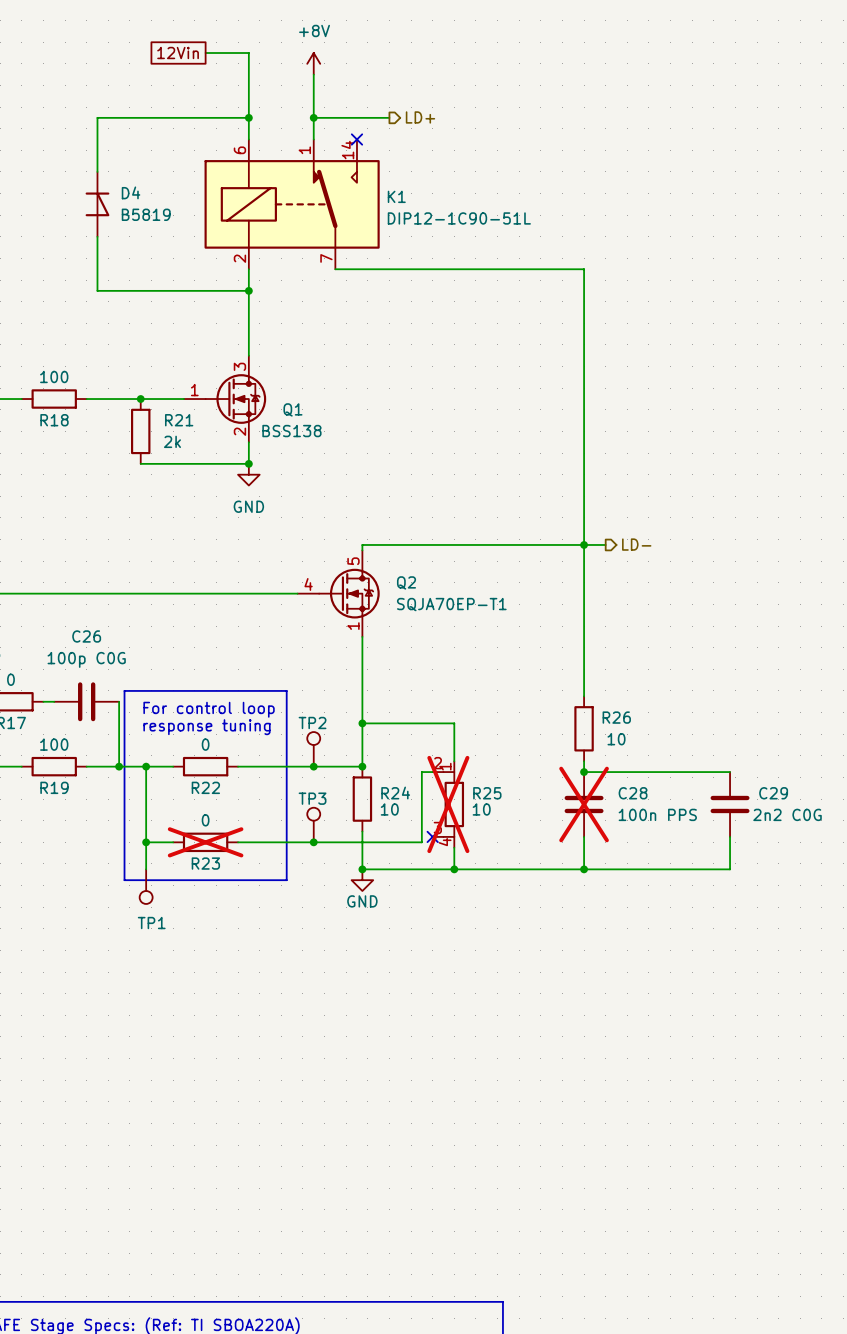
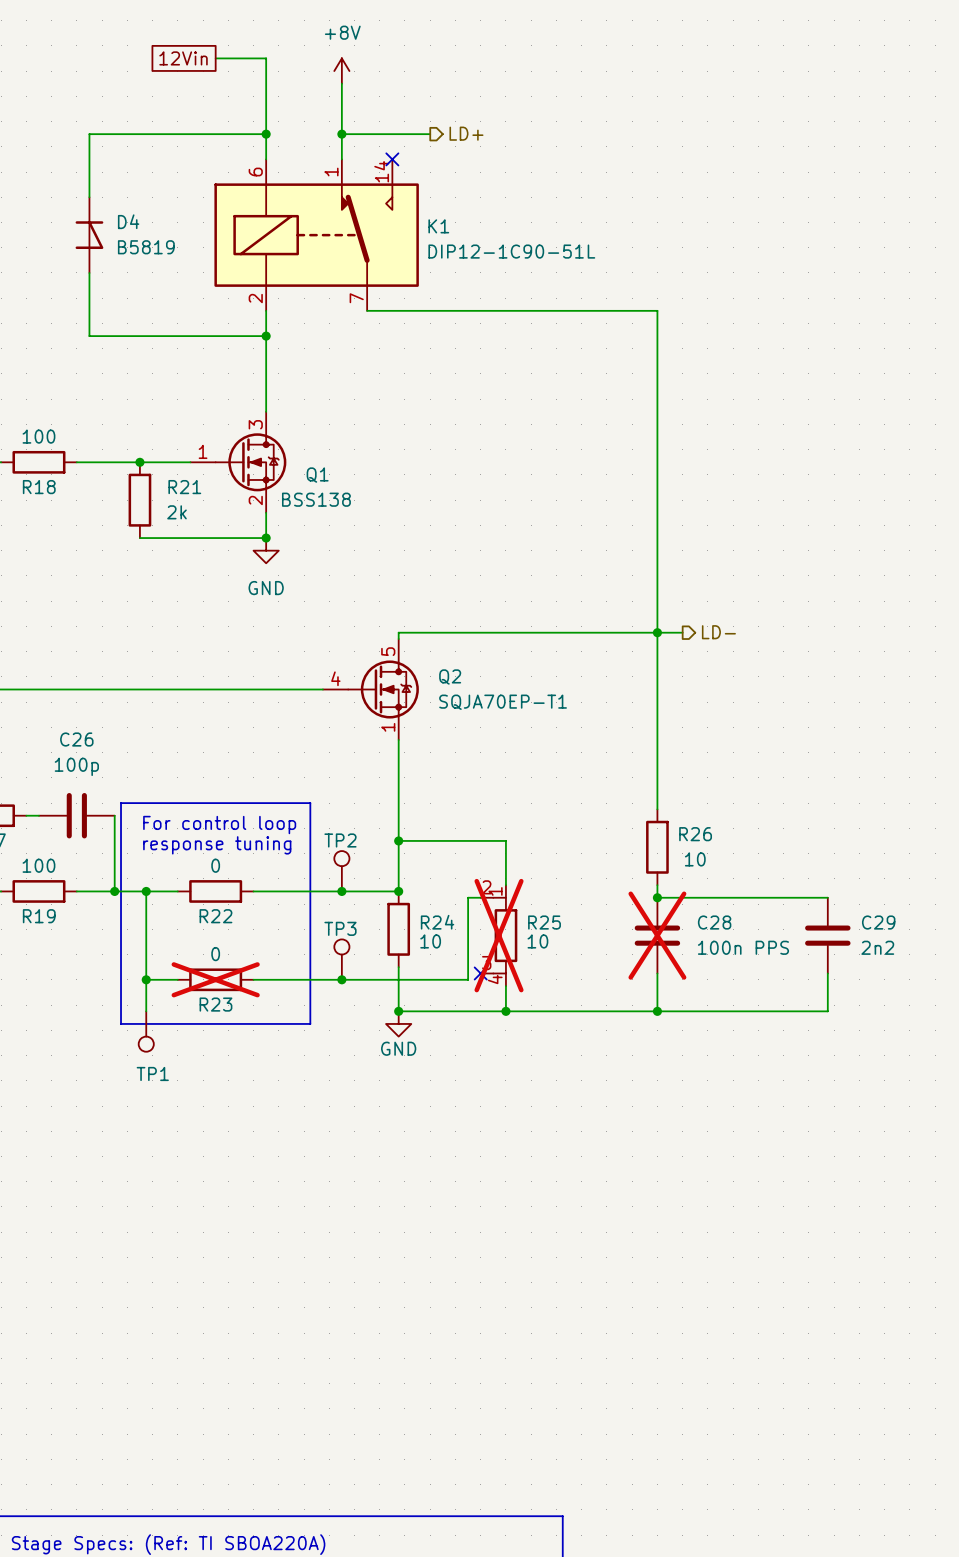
C26 value: 100p C0G (86, 659) -> 100p (76, 766)
C29 value: 2n2 C0G (787, 814) -> 2n2 (877, 947)

